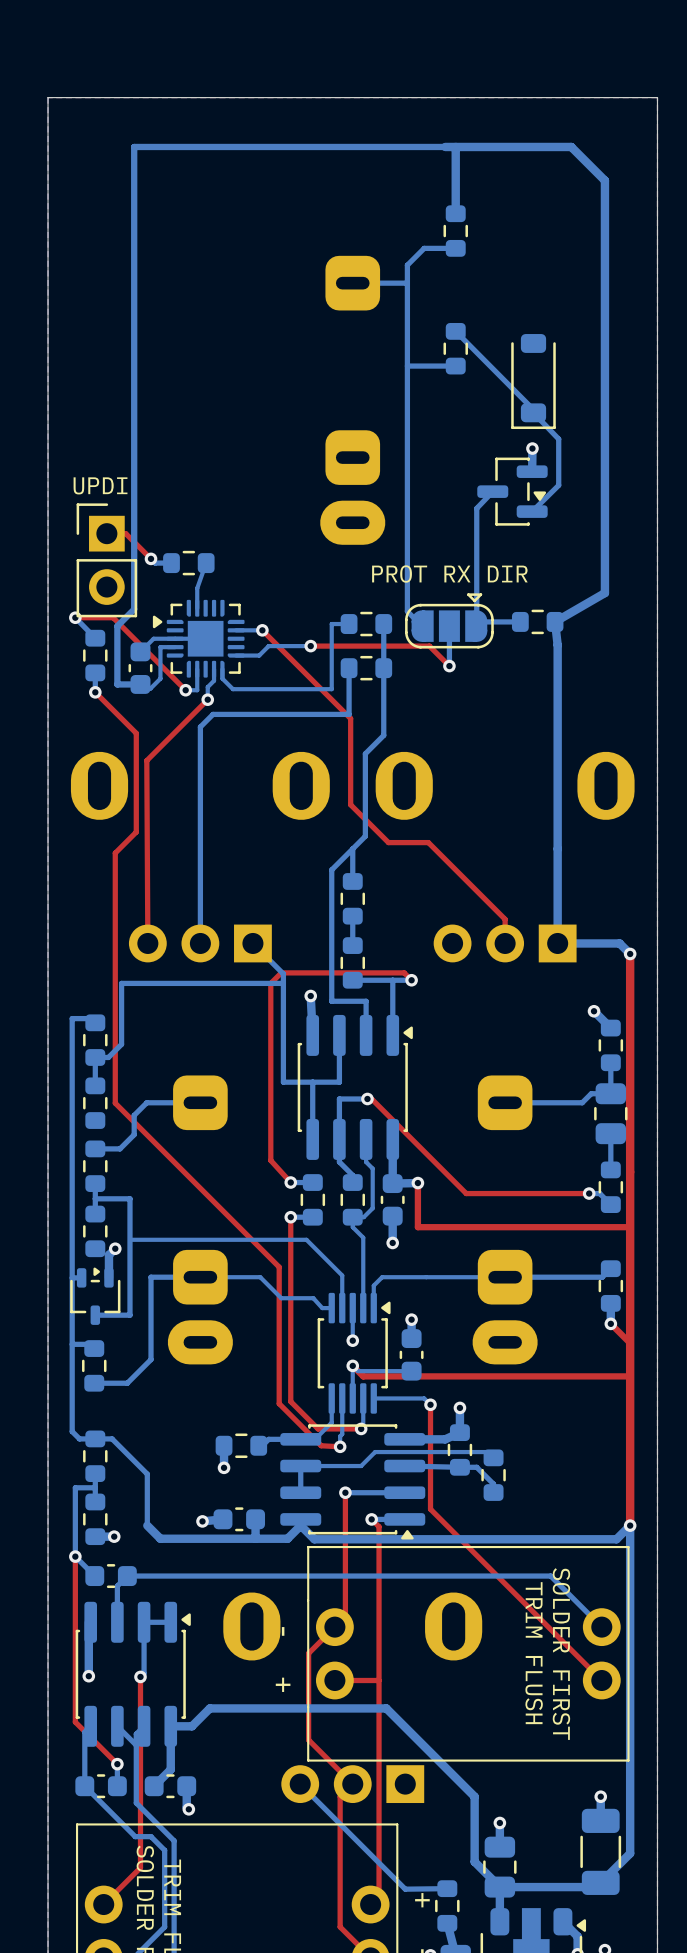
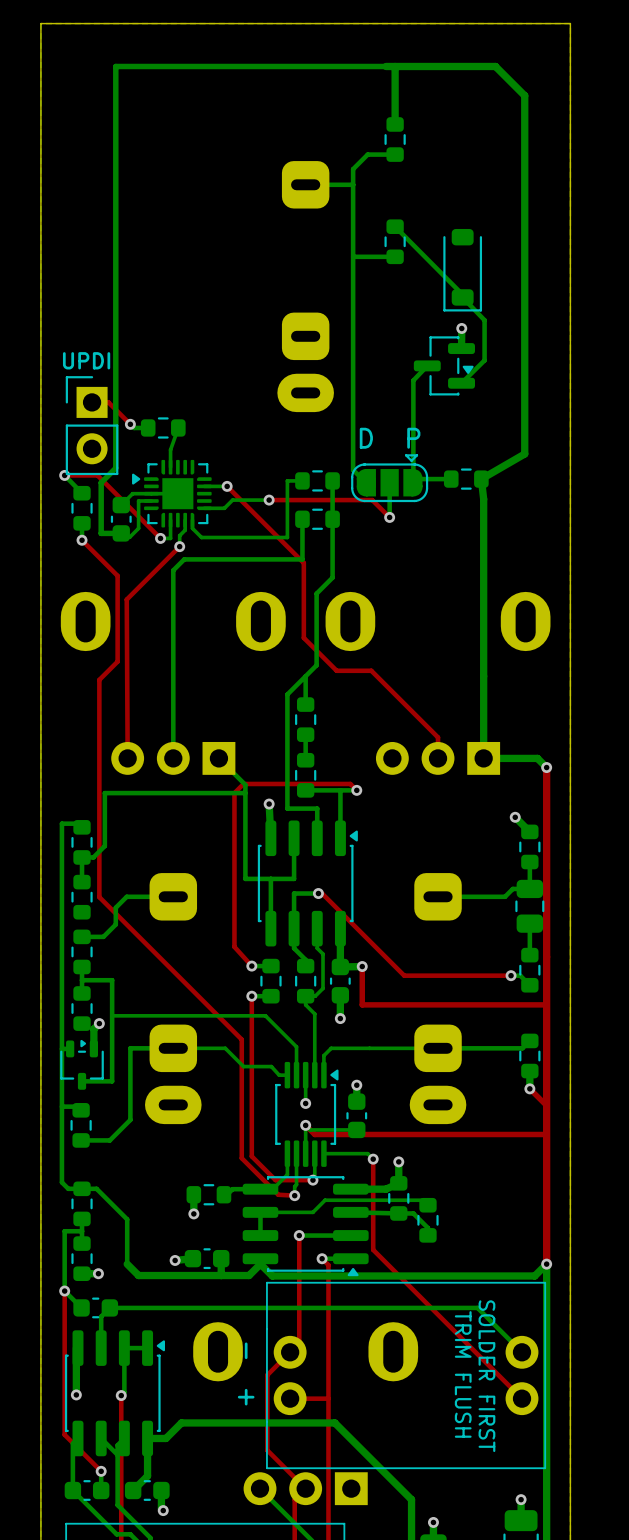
text: none -> D (366, 438)
text: PROT RX DIR (449, 574) -> none
text: none -> P (413, 438)

